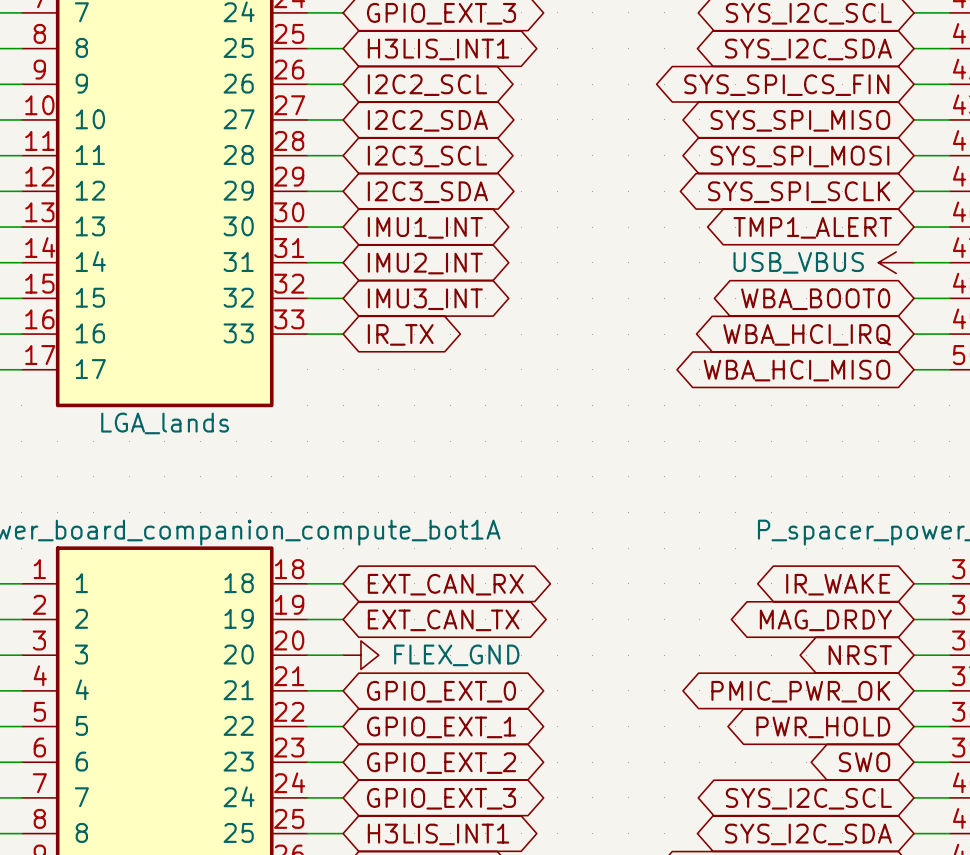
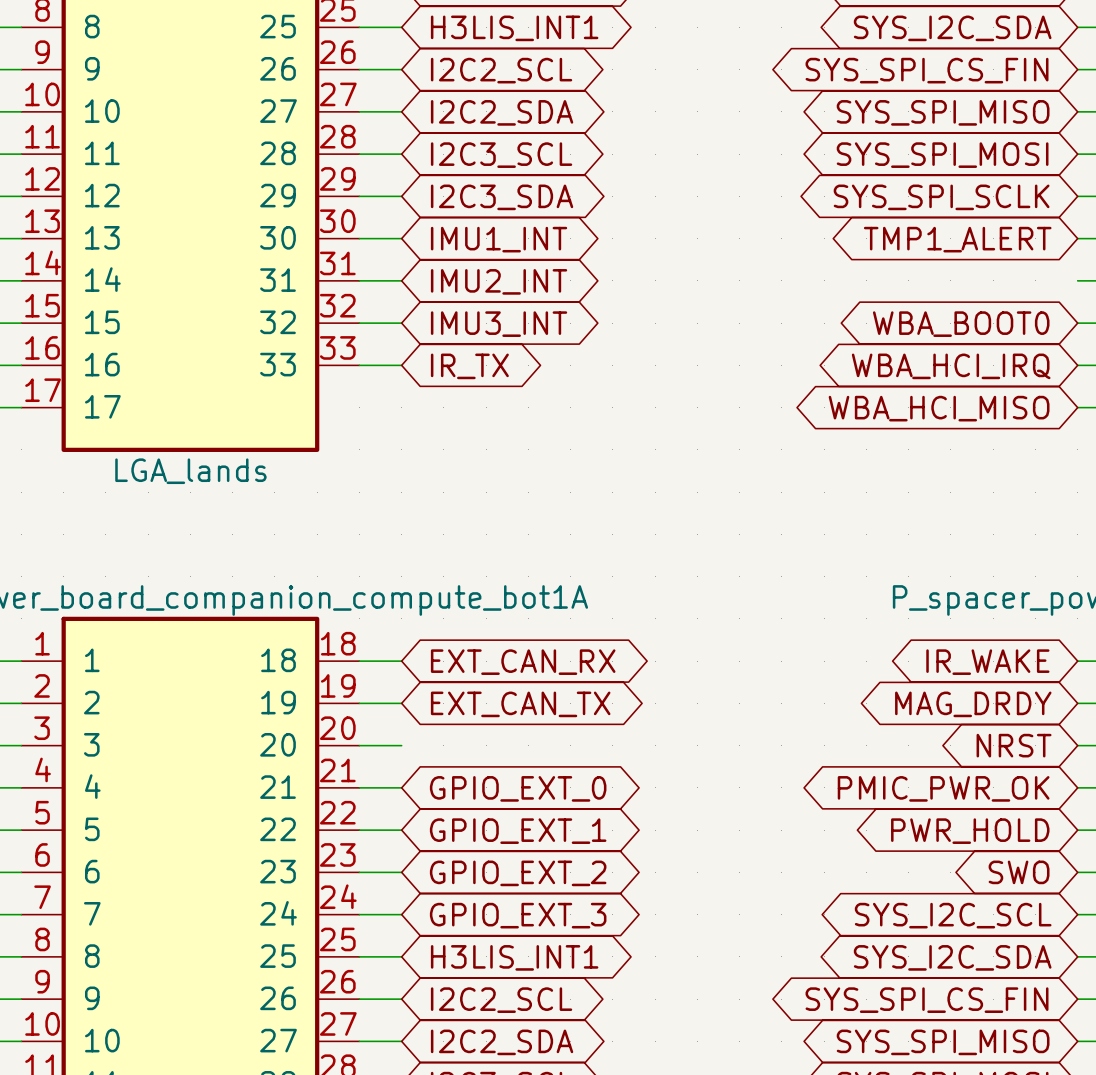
power symbol: USB_VBUS (896, 262) -> none
power symbol: FLEX_GND (360, 655) -> none

